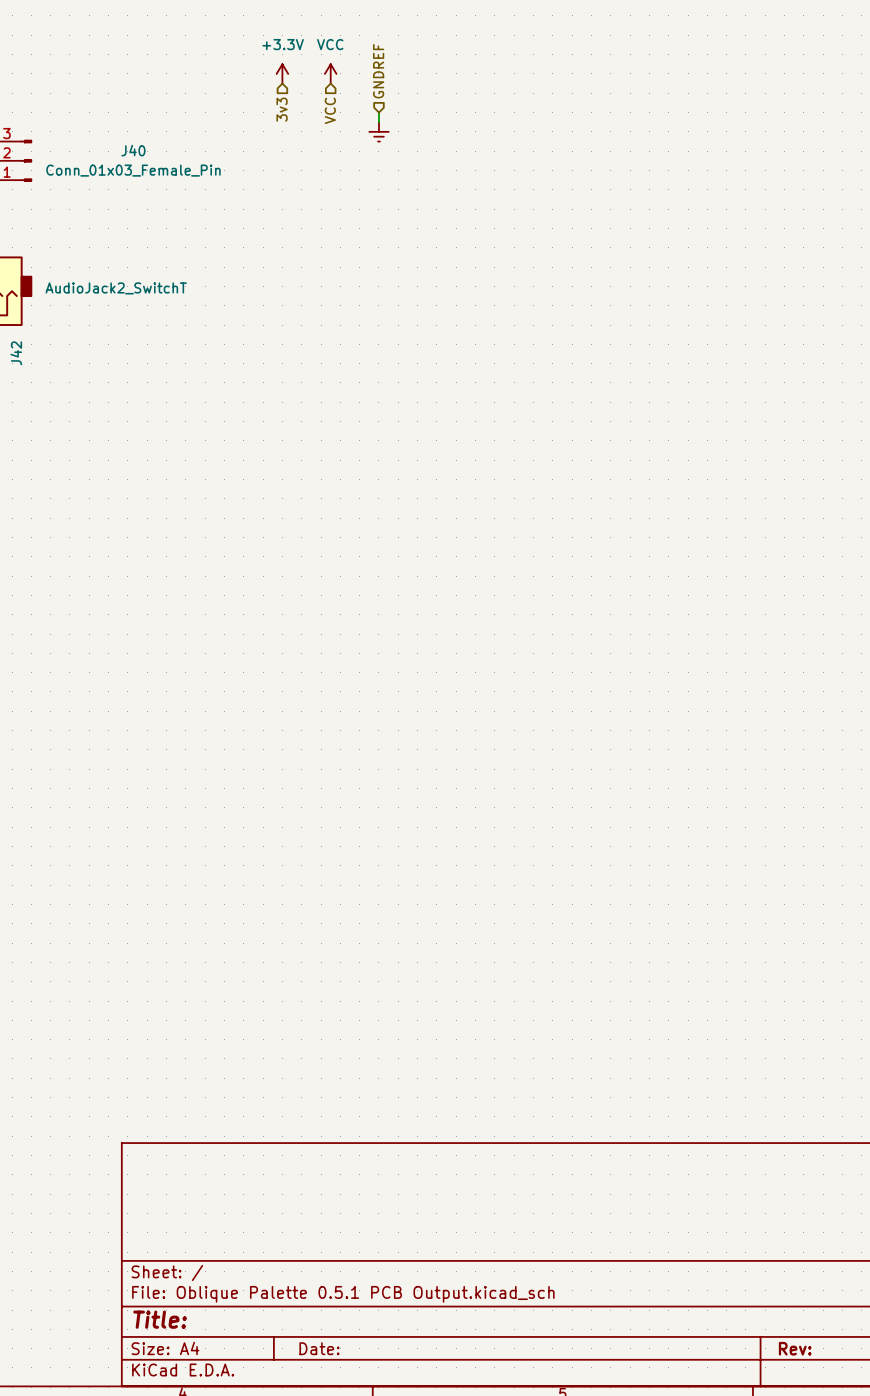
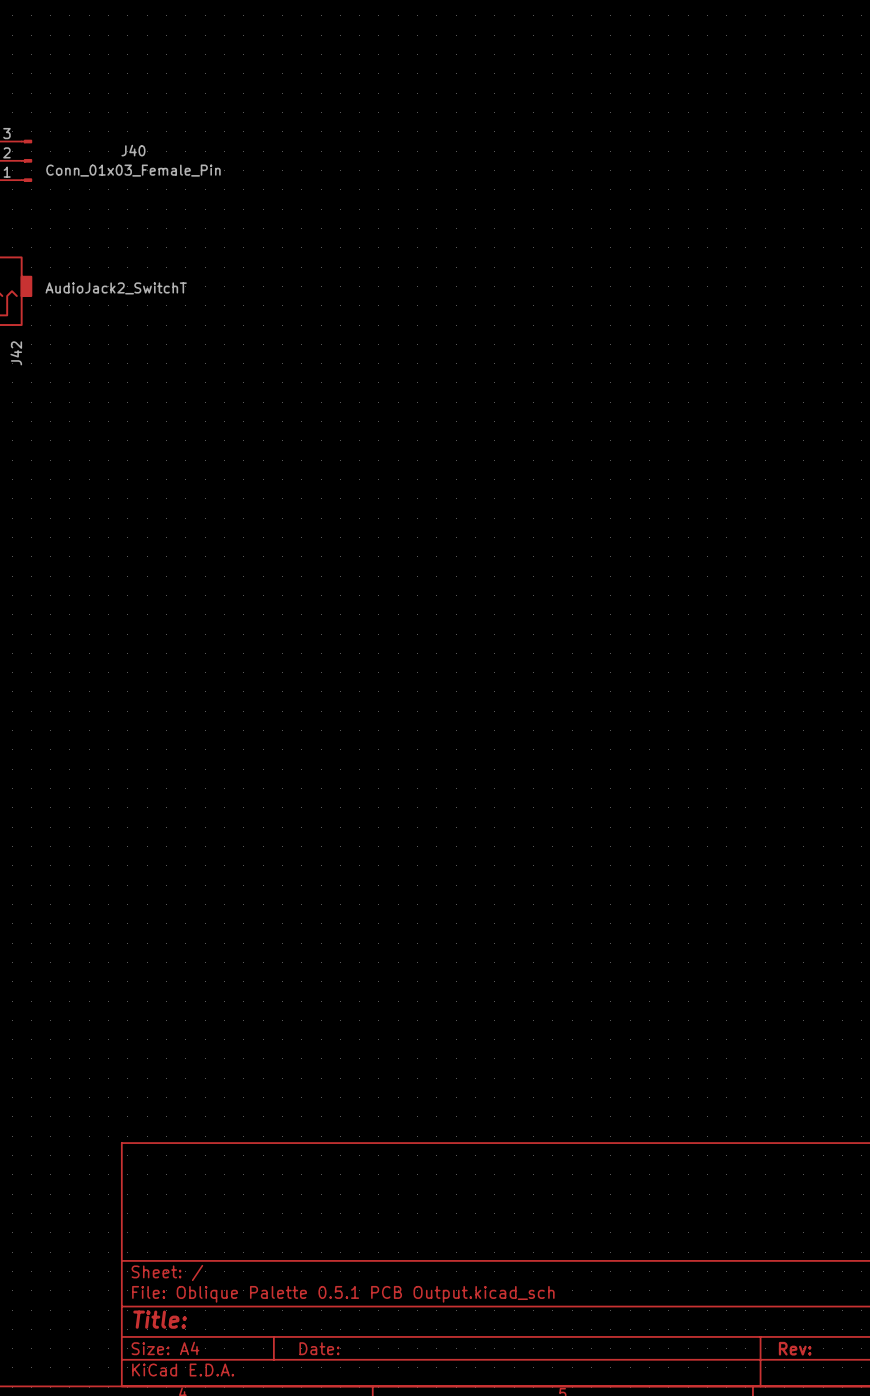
hierarchical label: GNDREF (378, 71) -> none
power symbol: +3.3V (282, 73) -> none
power symbol: VCC (330, 73) -> none
hierarchical label: 3v3 (282, 109) -> none
hierarchical label: VCC (330, 110) -> none
wire: (378, 112) (378, 122) -> none
power symbol: (378, 131) -> none

